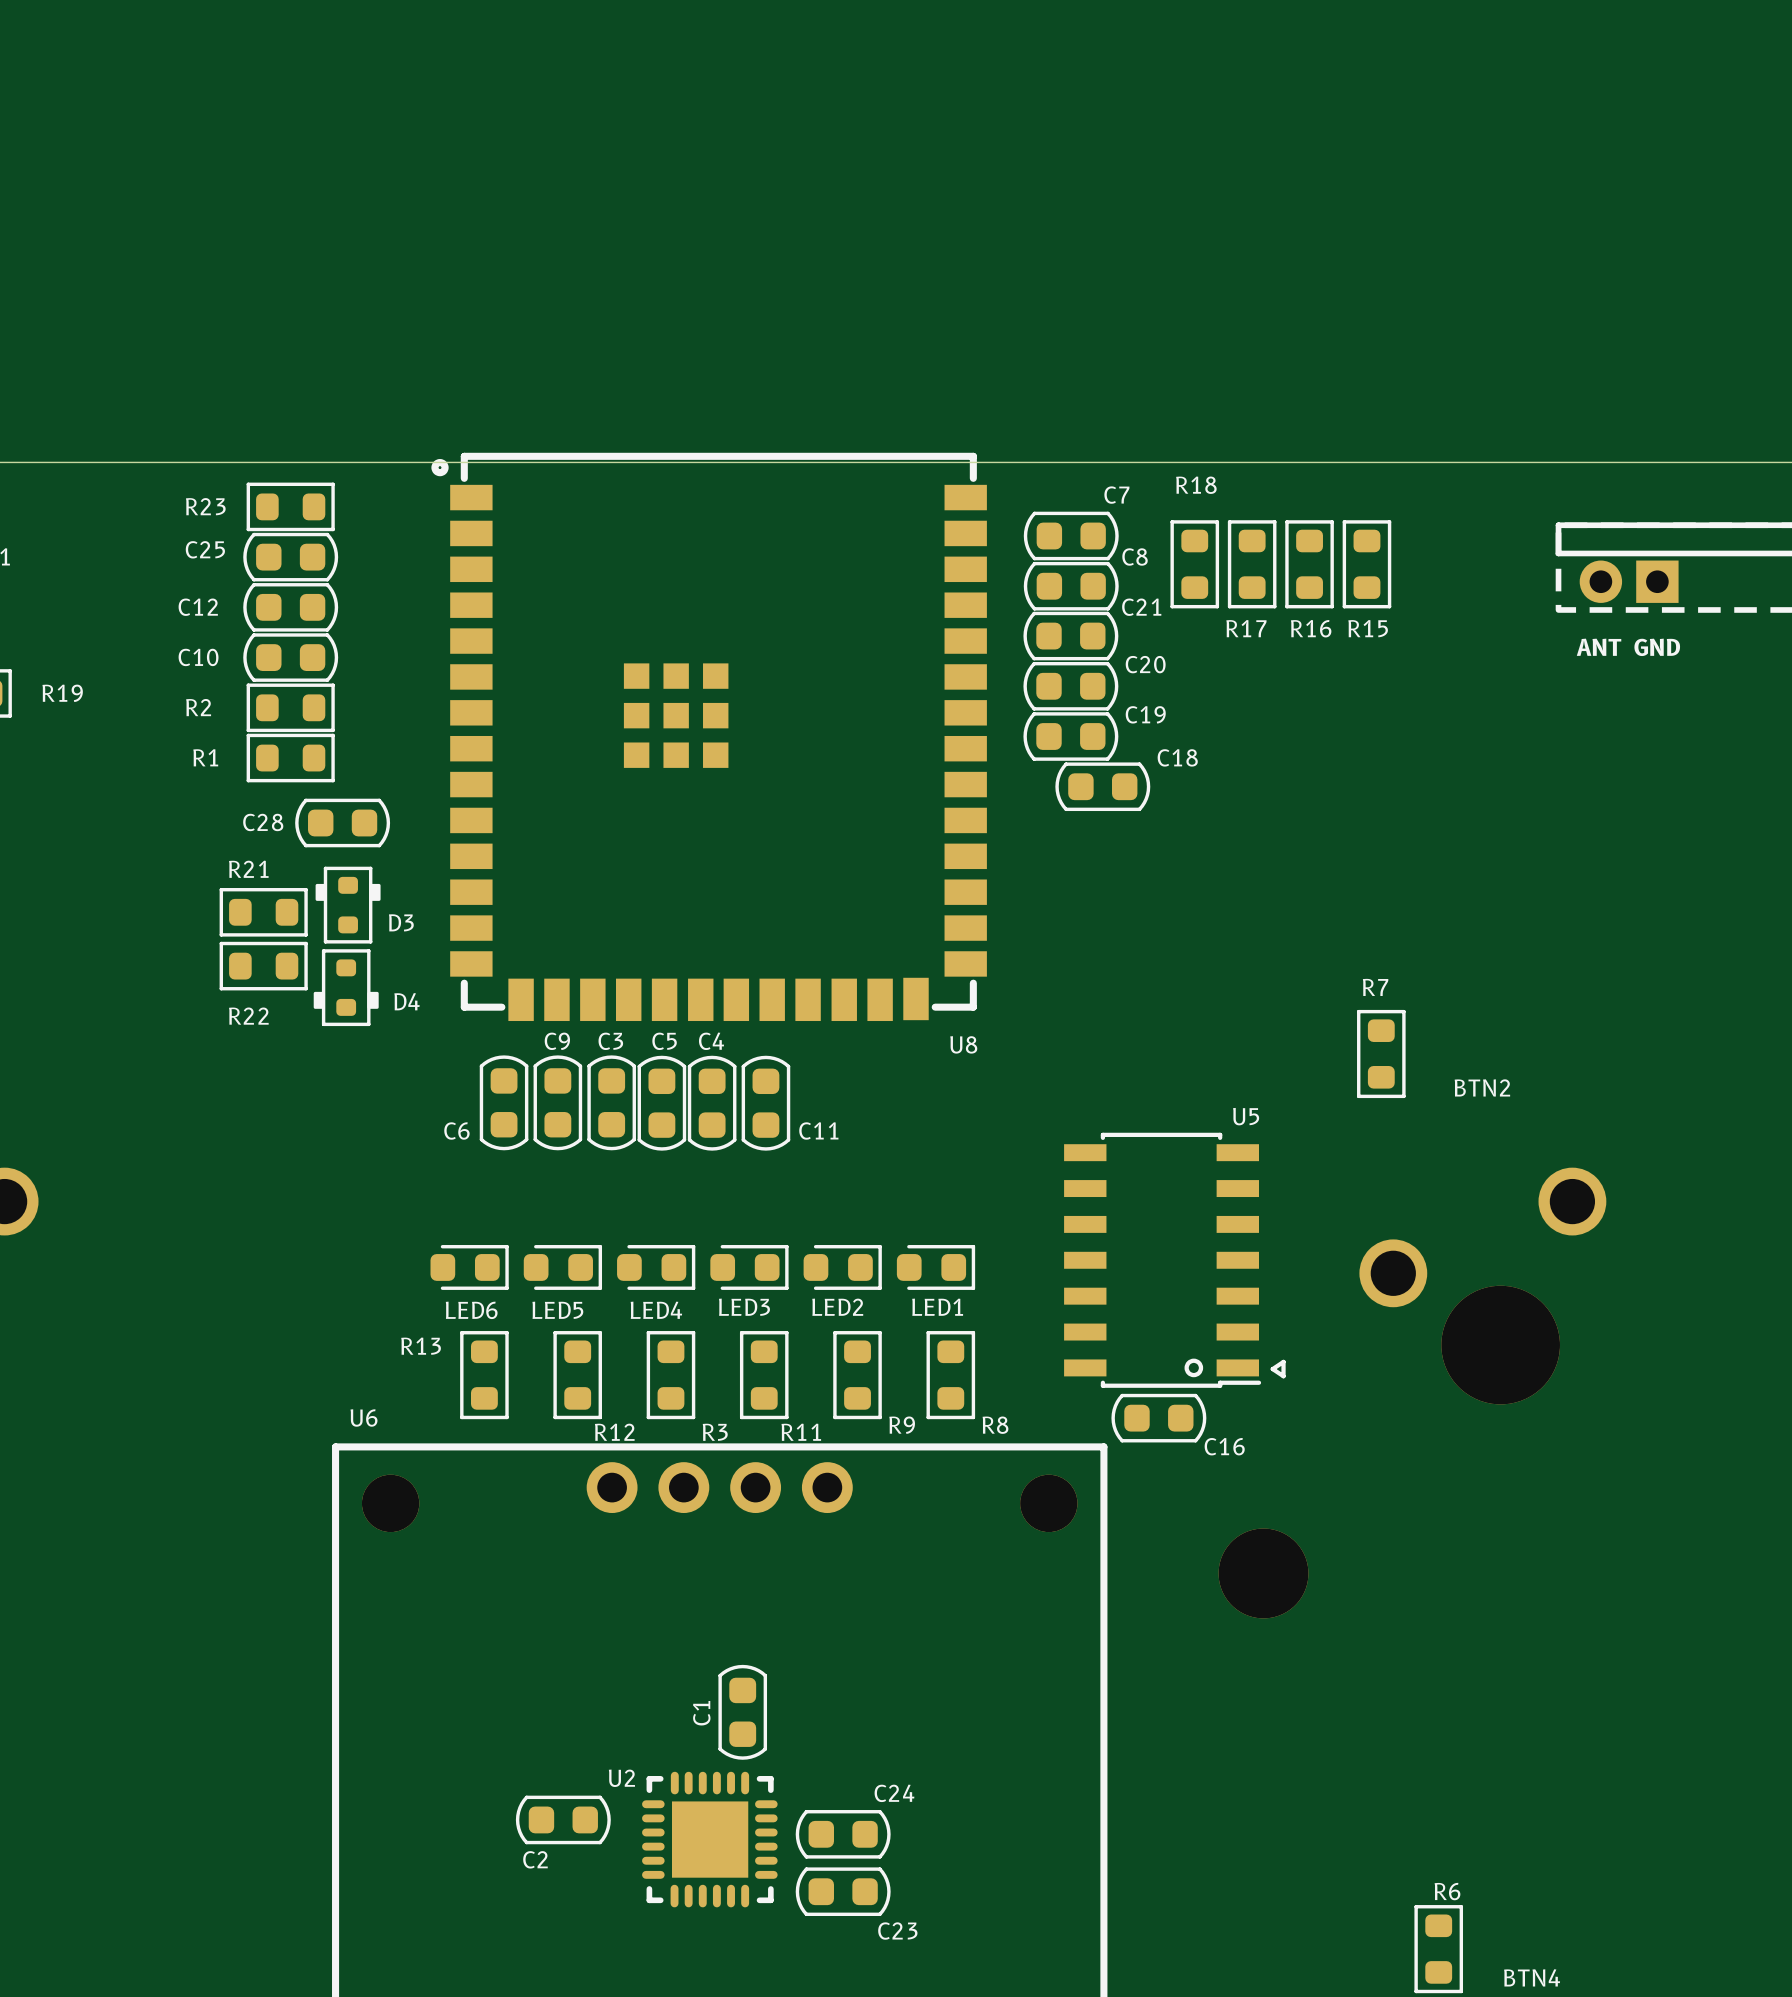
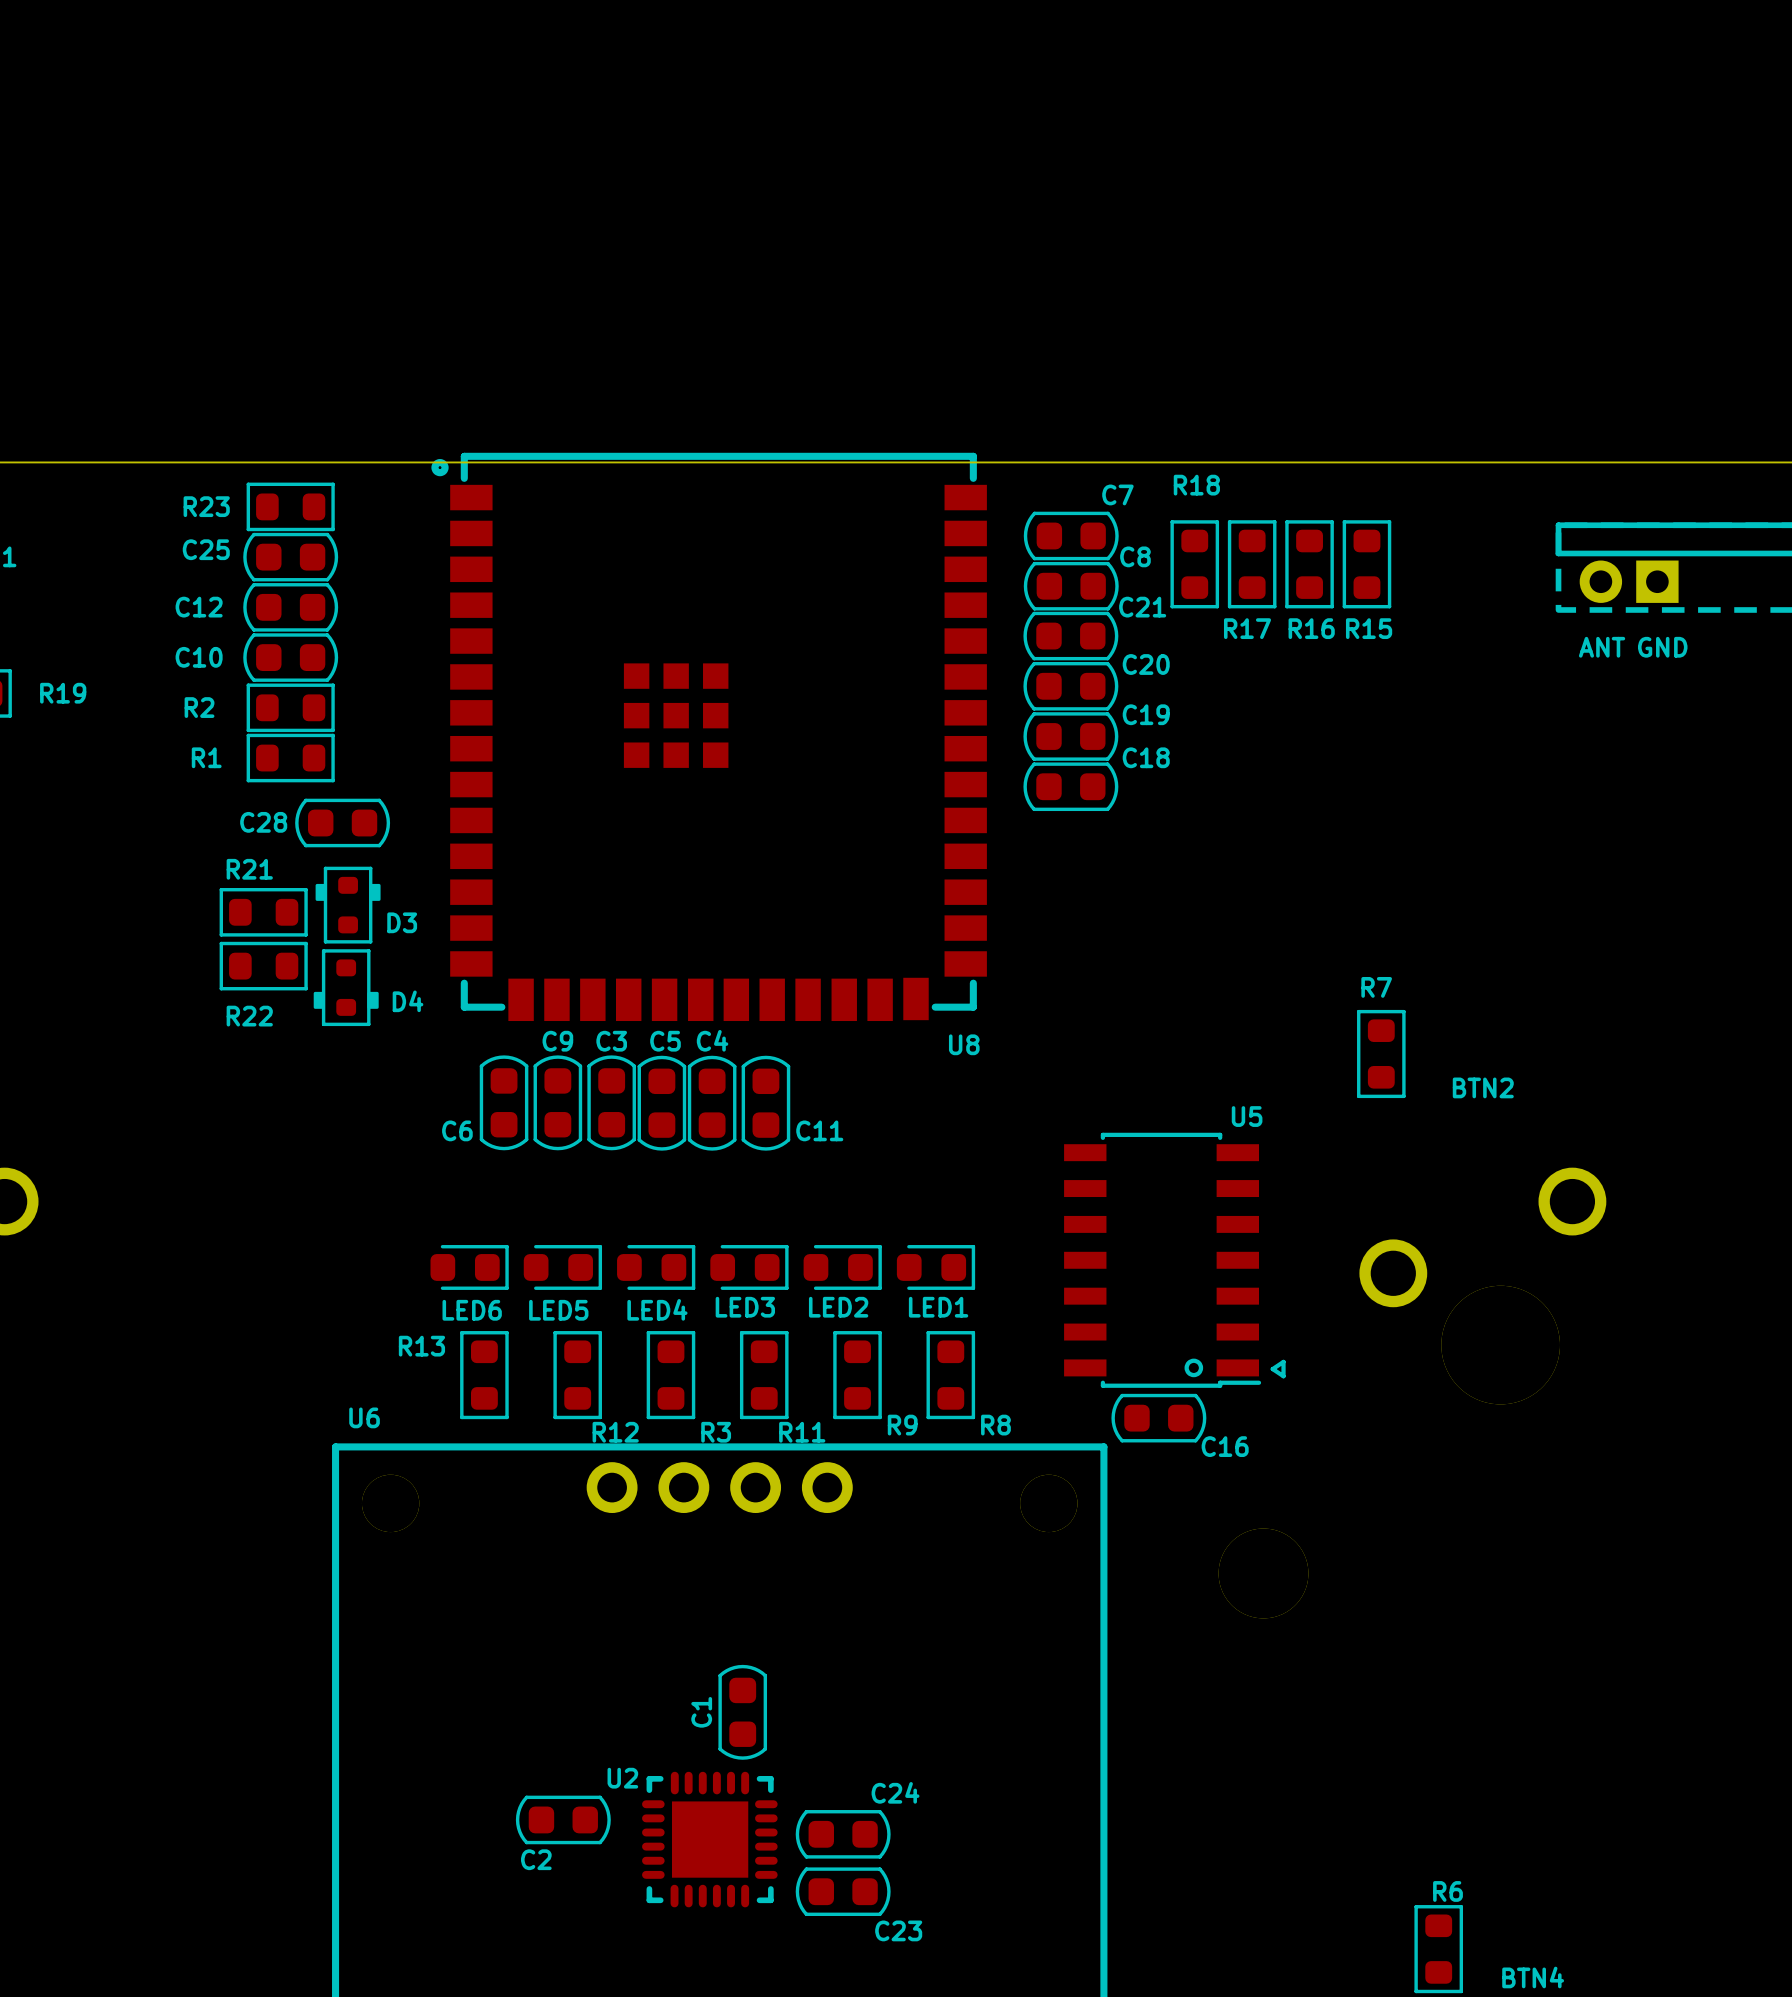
C18 position: (1102, 786) -> (1070, 786)

